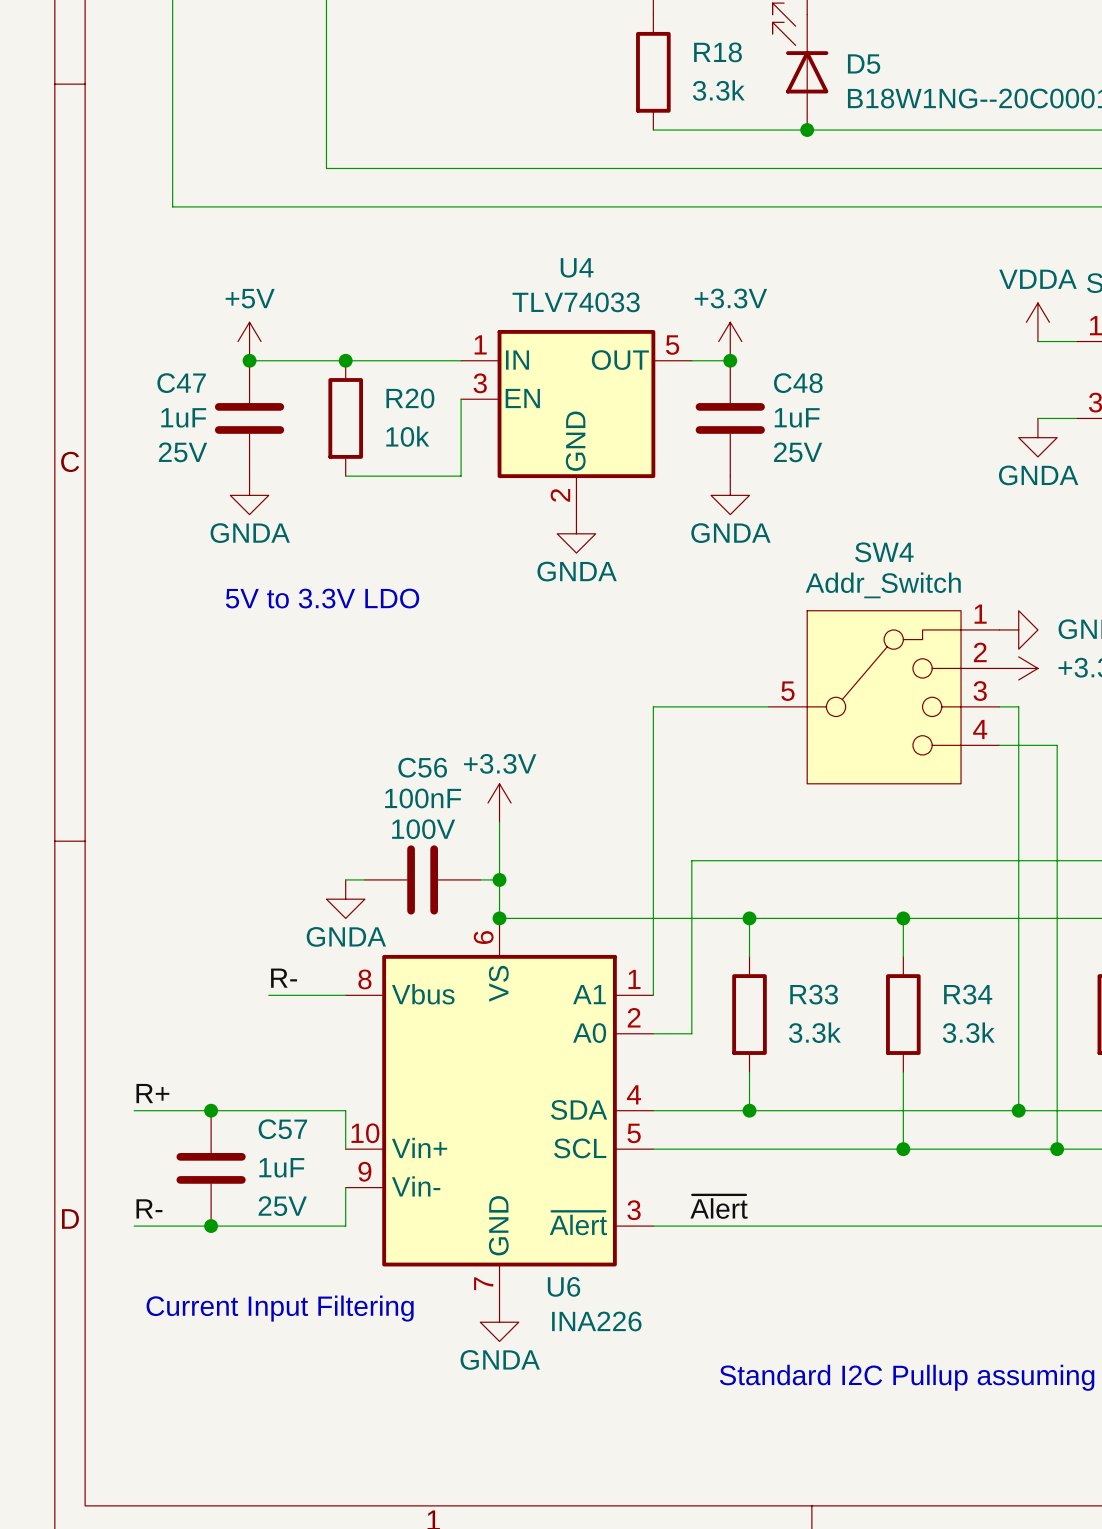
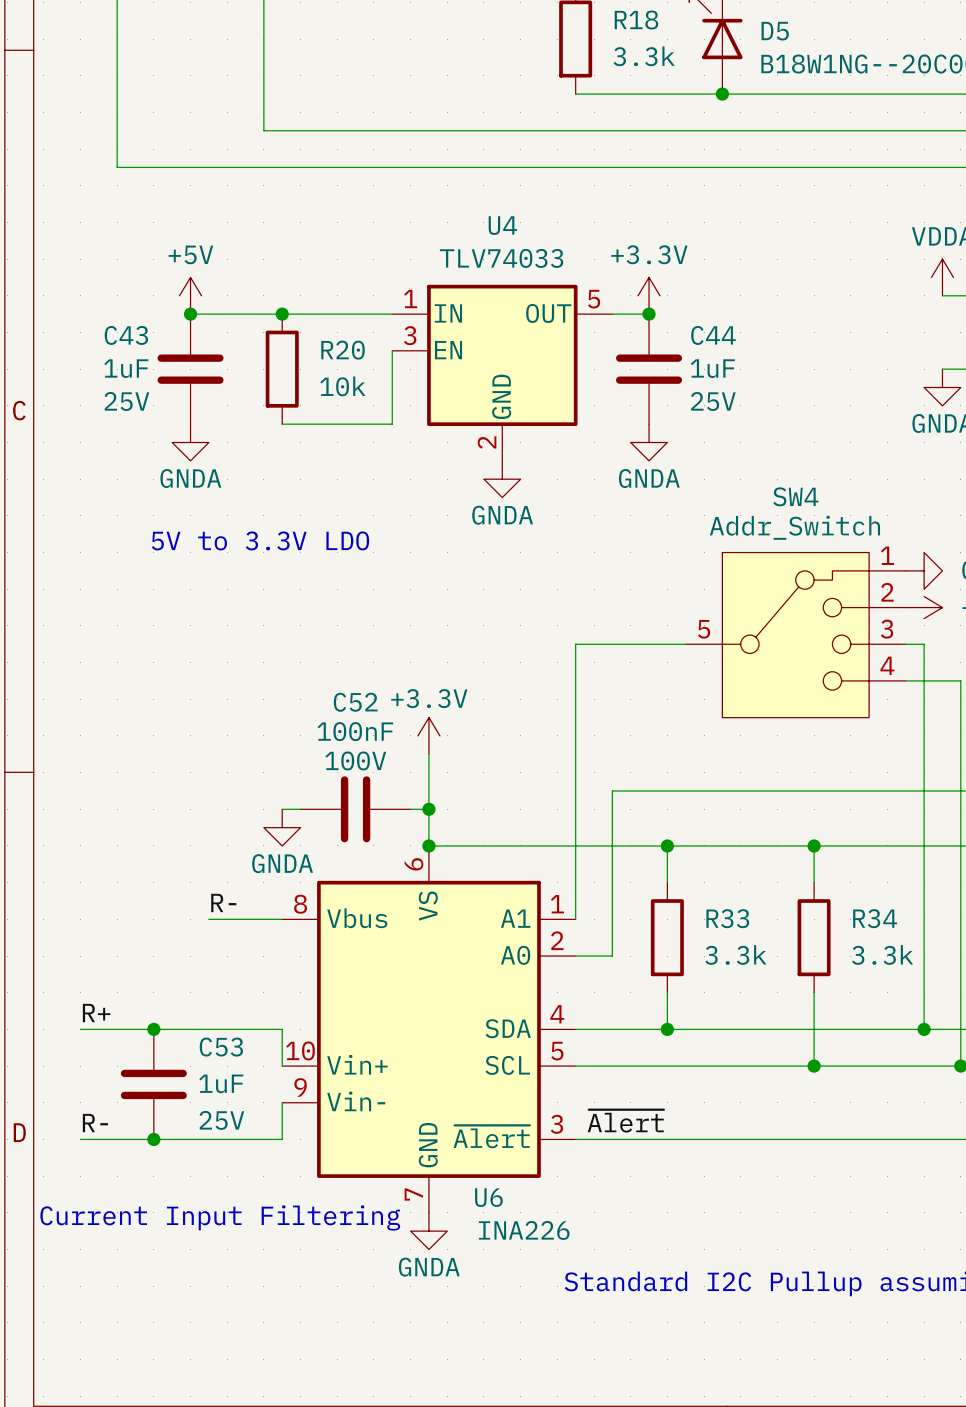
C47 name: C47 (181, 383) -> C43 (126, 335)
C48 name: C48 (798, 383) -> C44 (713, 335)
C56 name: C56 (422, 767) -> C52 (355, 702)
C57 name: C57 (282, 1129) -> C53 (221, 1047)

